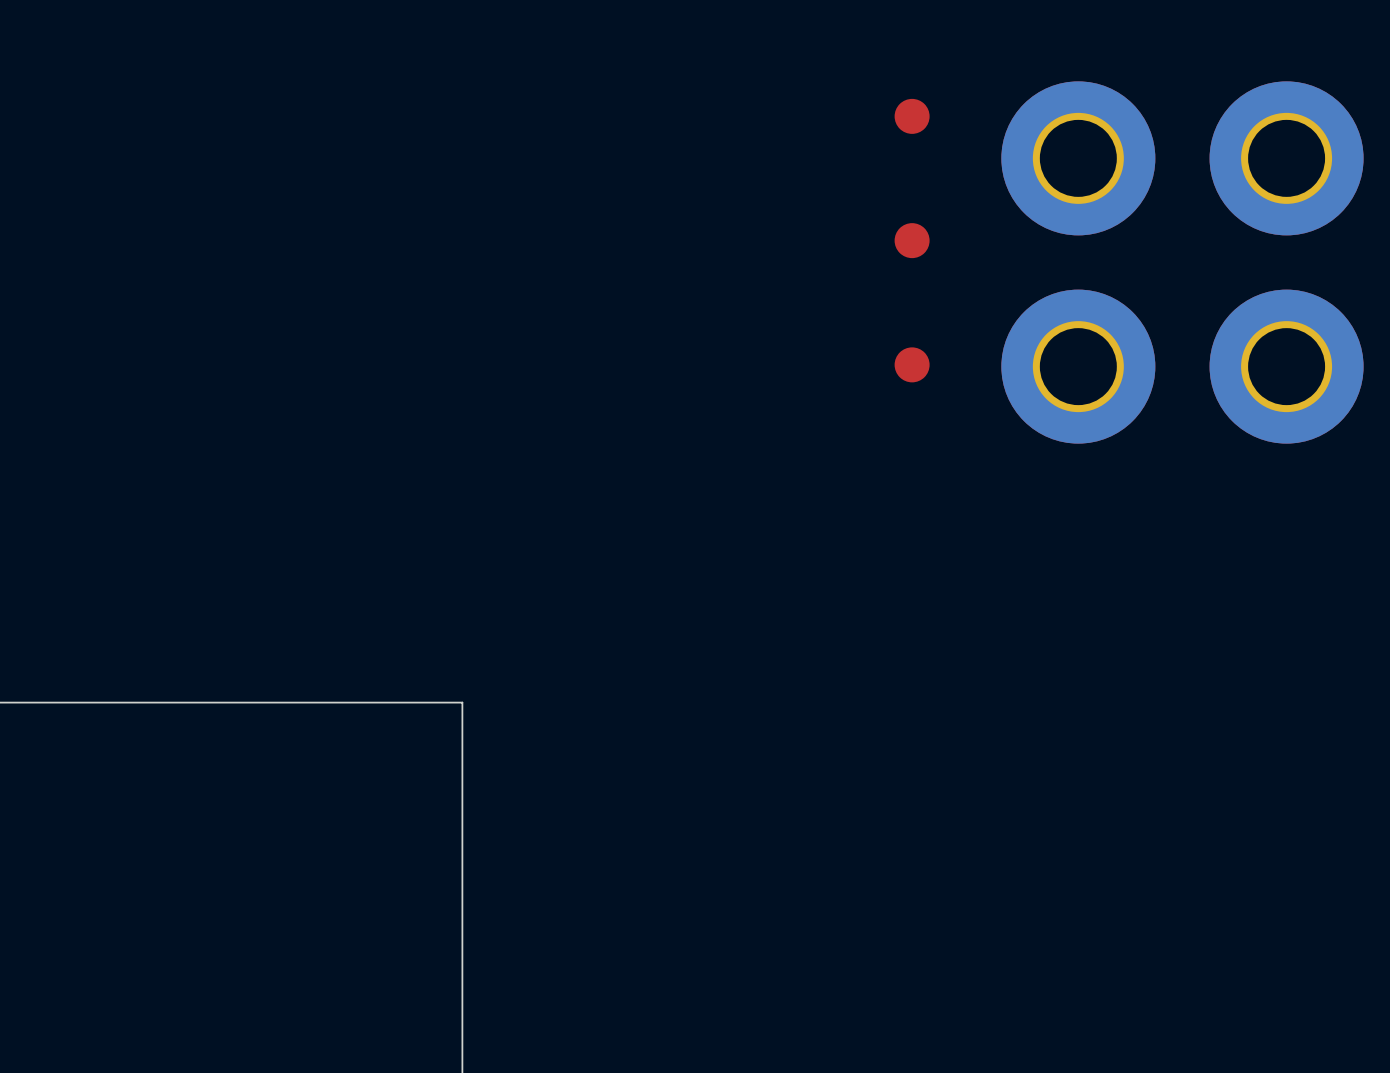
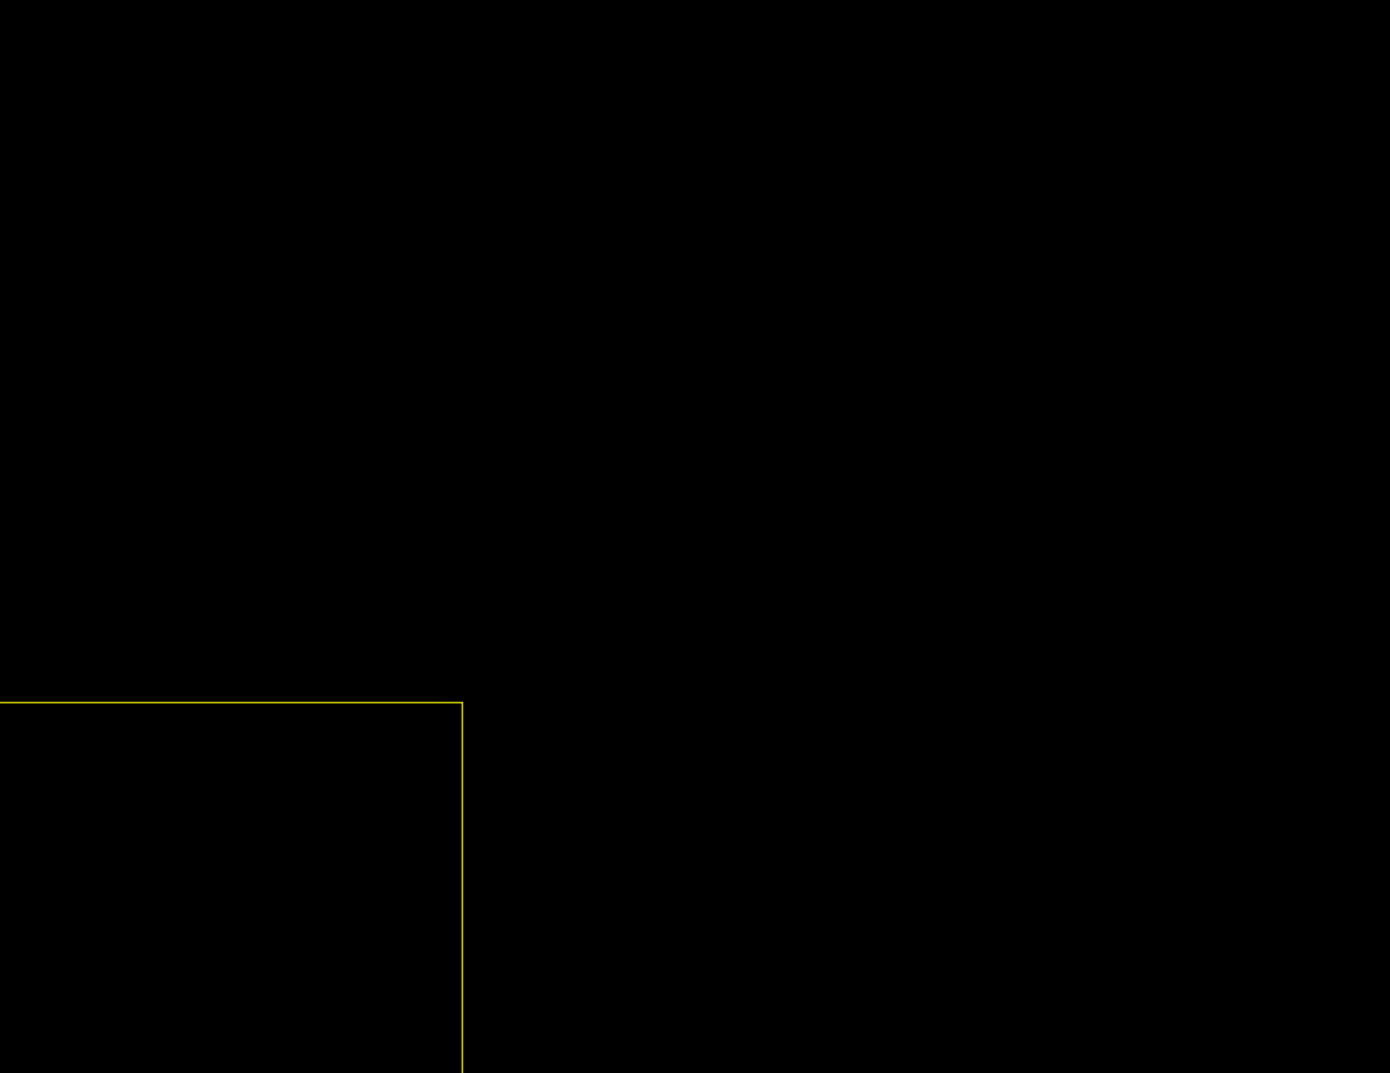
part: (912, 116) -> none
part: (1078, 158) -> none
part: (1286, 158) -> none
part: (912, 240) -> none
part: (912, 364) -> none
part: (1078, 366) -> none
part: (1286, 366) -> none

